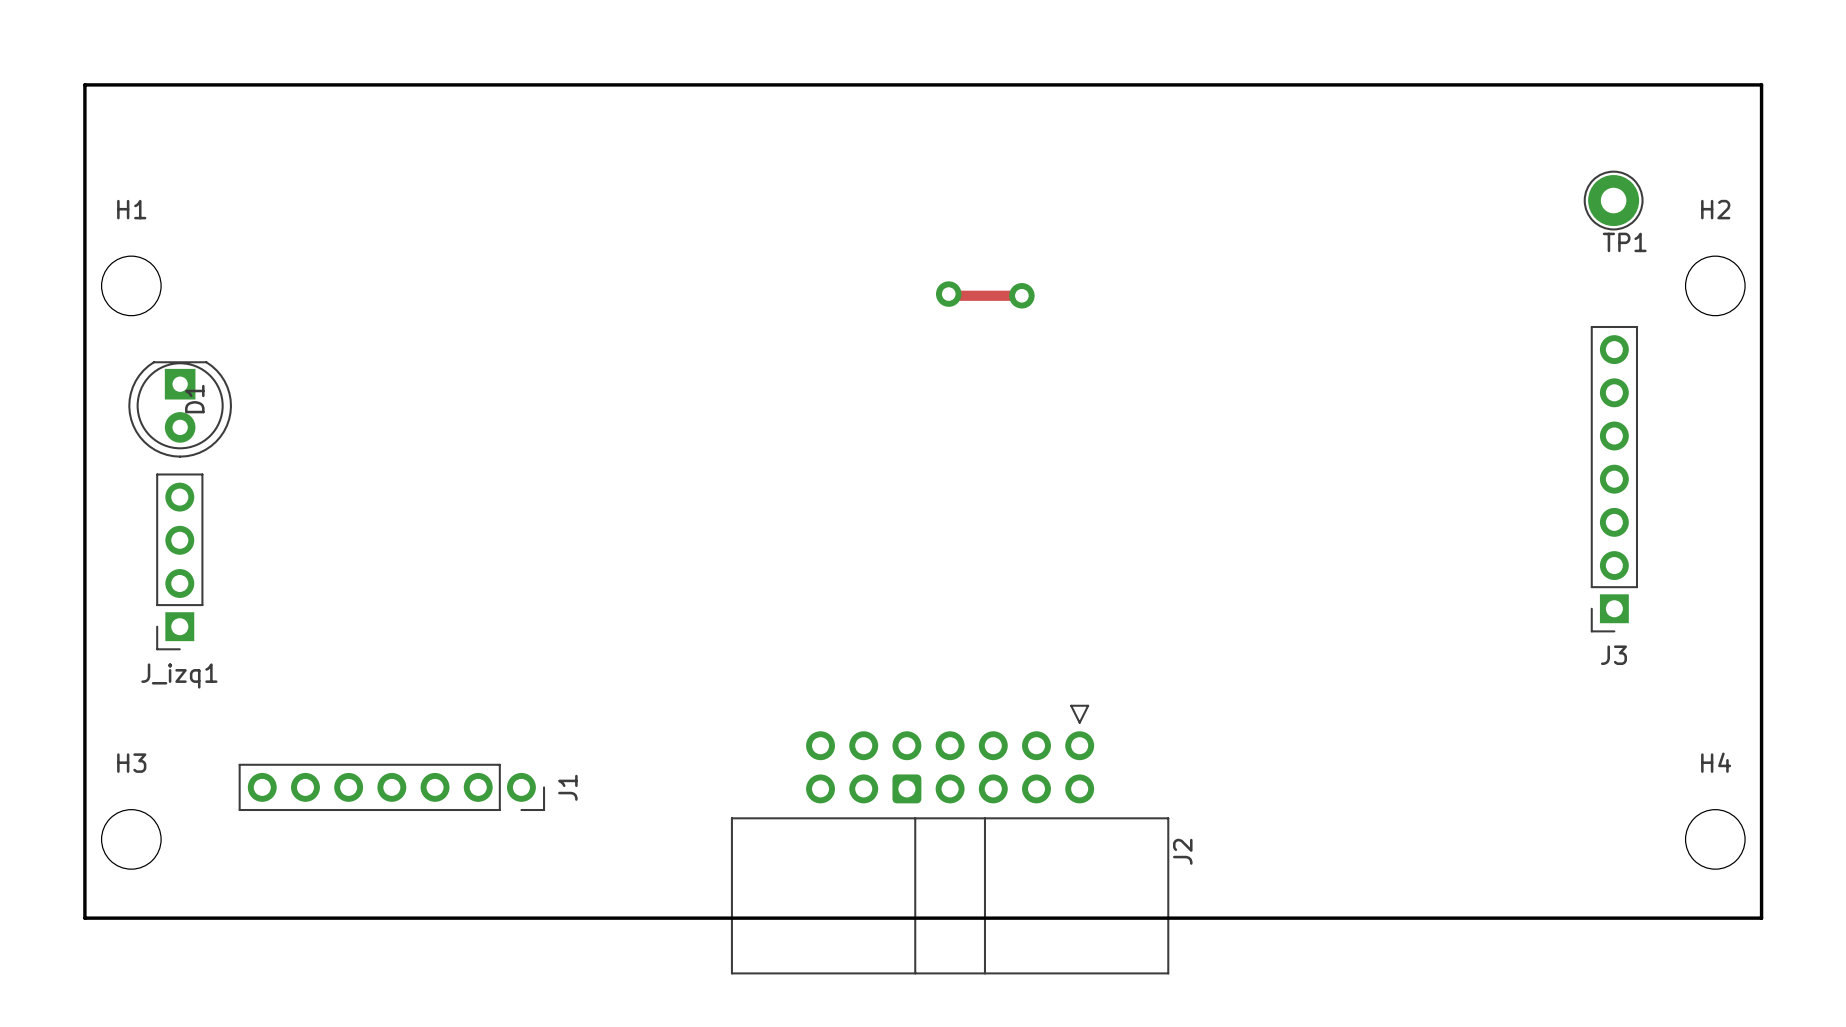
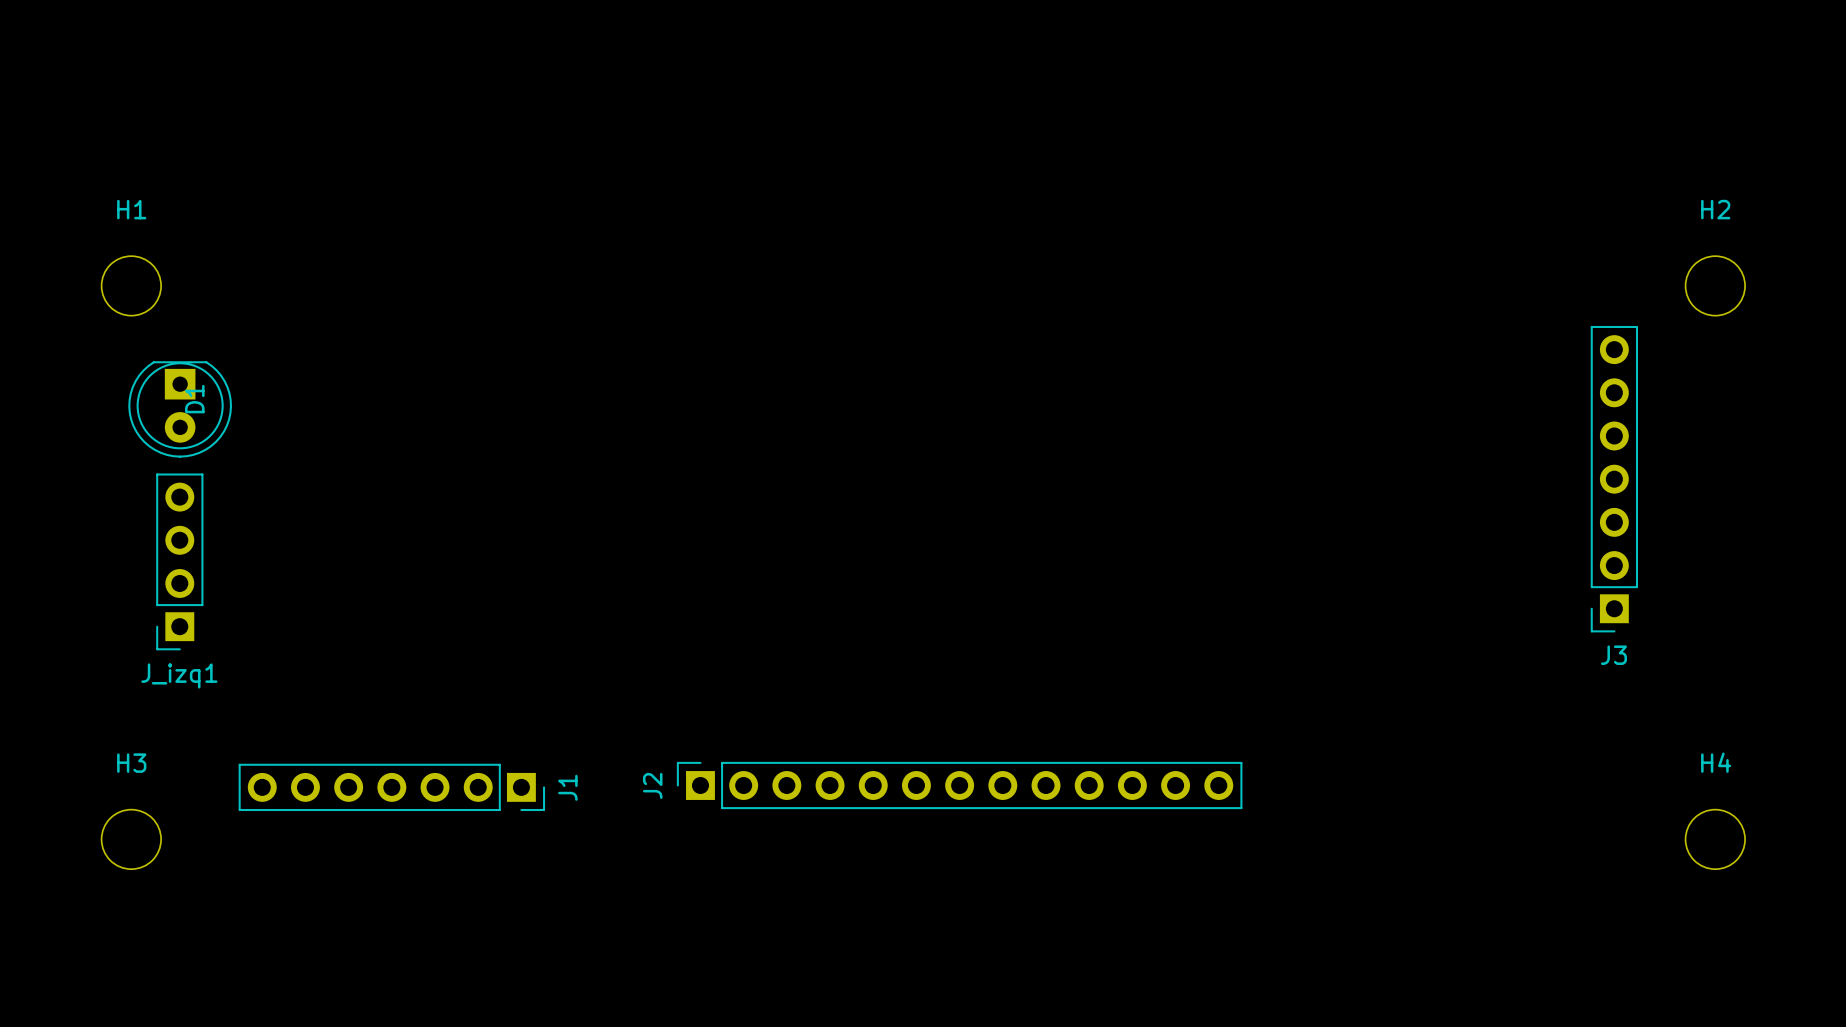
board edge: (84, 84) (1761, 84) (1761, 918) (84, 918) (84, 84) -> none
TP1: (1613, 200) -> none
track: (948, 294) (950, 295) (1021, 295) -> none
via: (948, 294) -> none
via: (1021, 295) -> none
J2 footprint: [730, 704, 1170, 975] -> [676, 761, 1243, 810]
J1 footprint: [238, 763, 546, 812] -> [238, 763, 546, 812]
J2 name position: J2 (1182, 851) -> J2 (652, 785)

